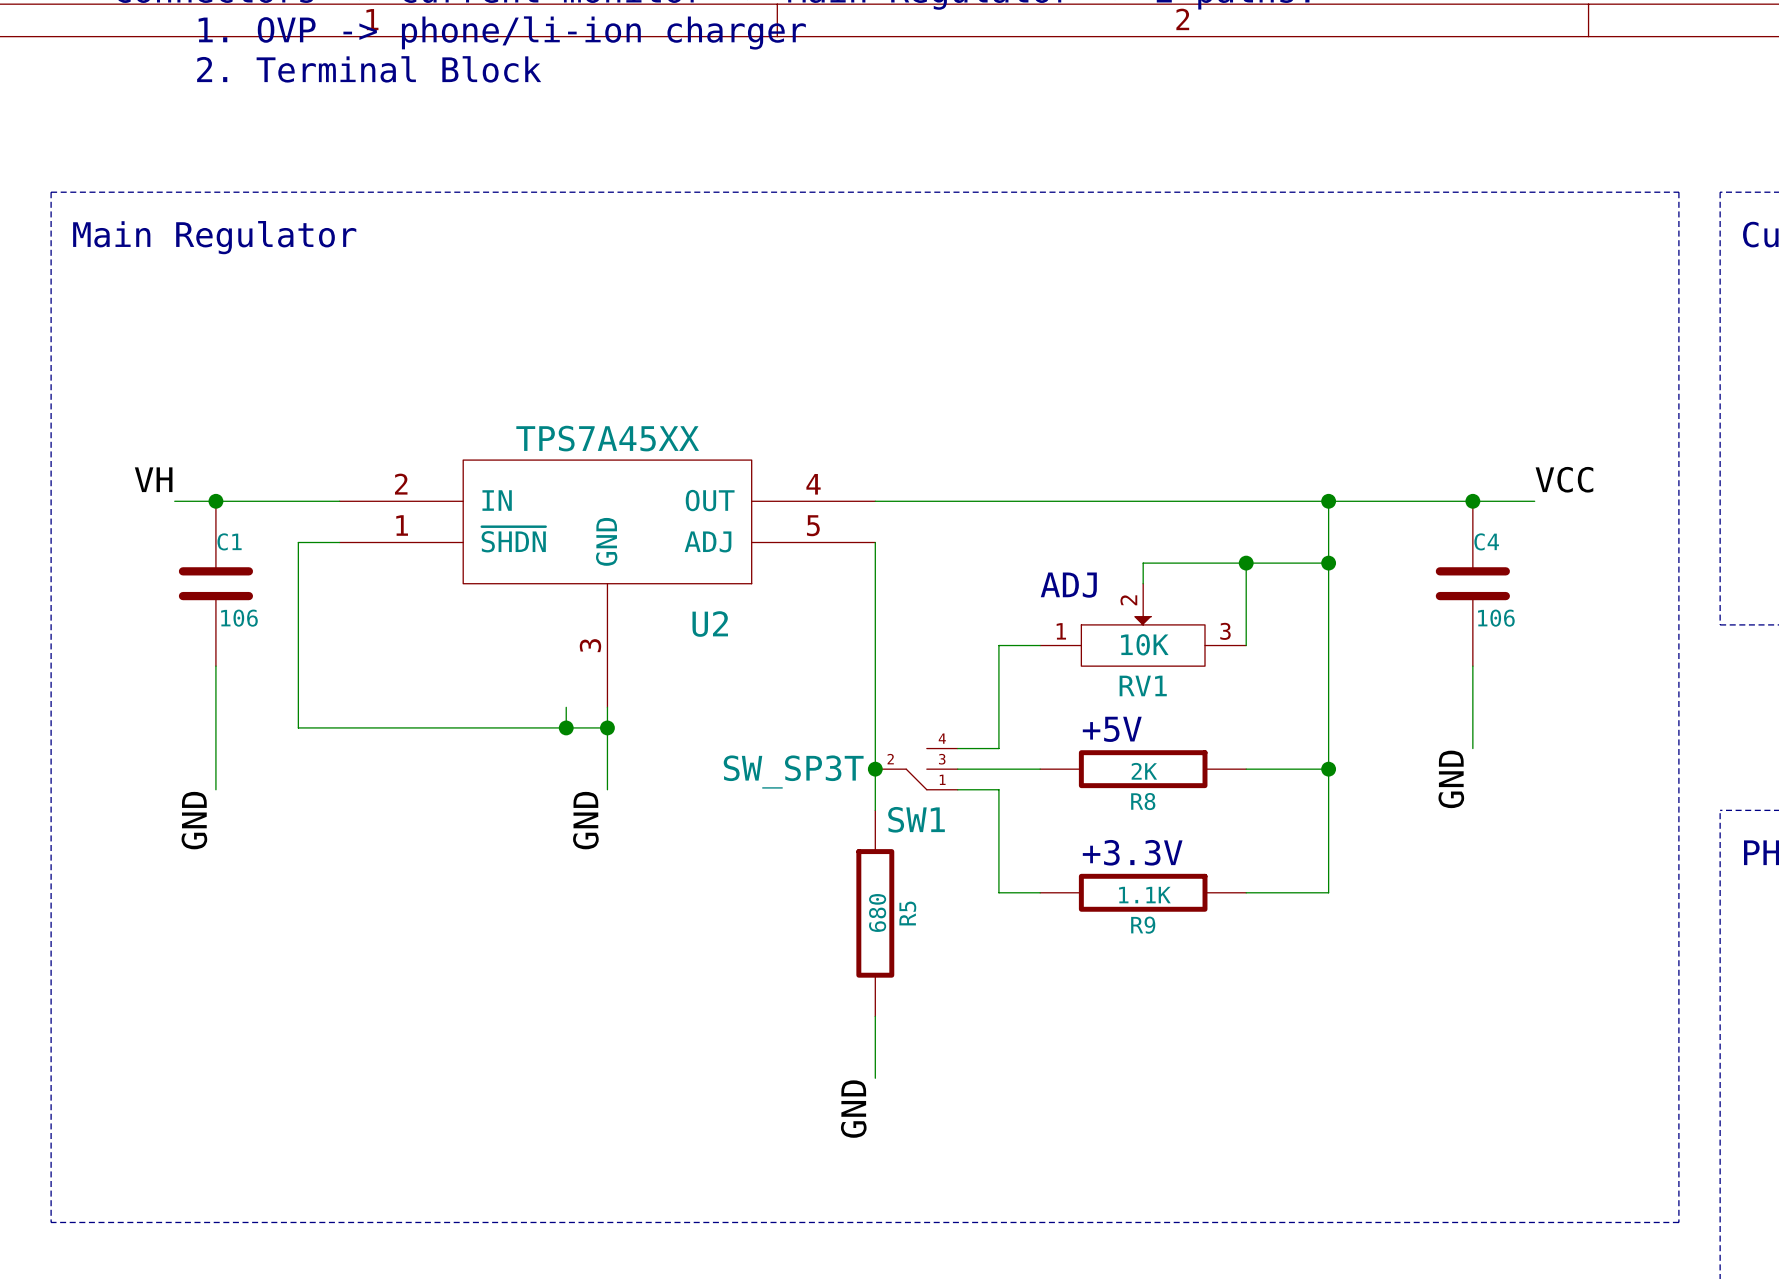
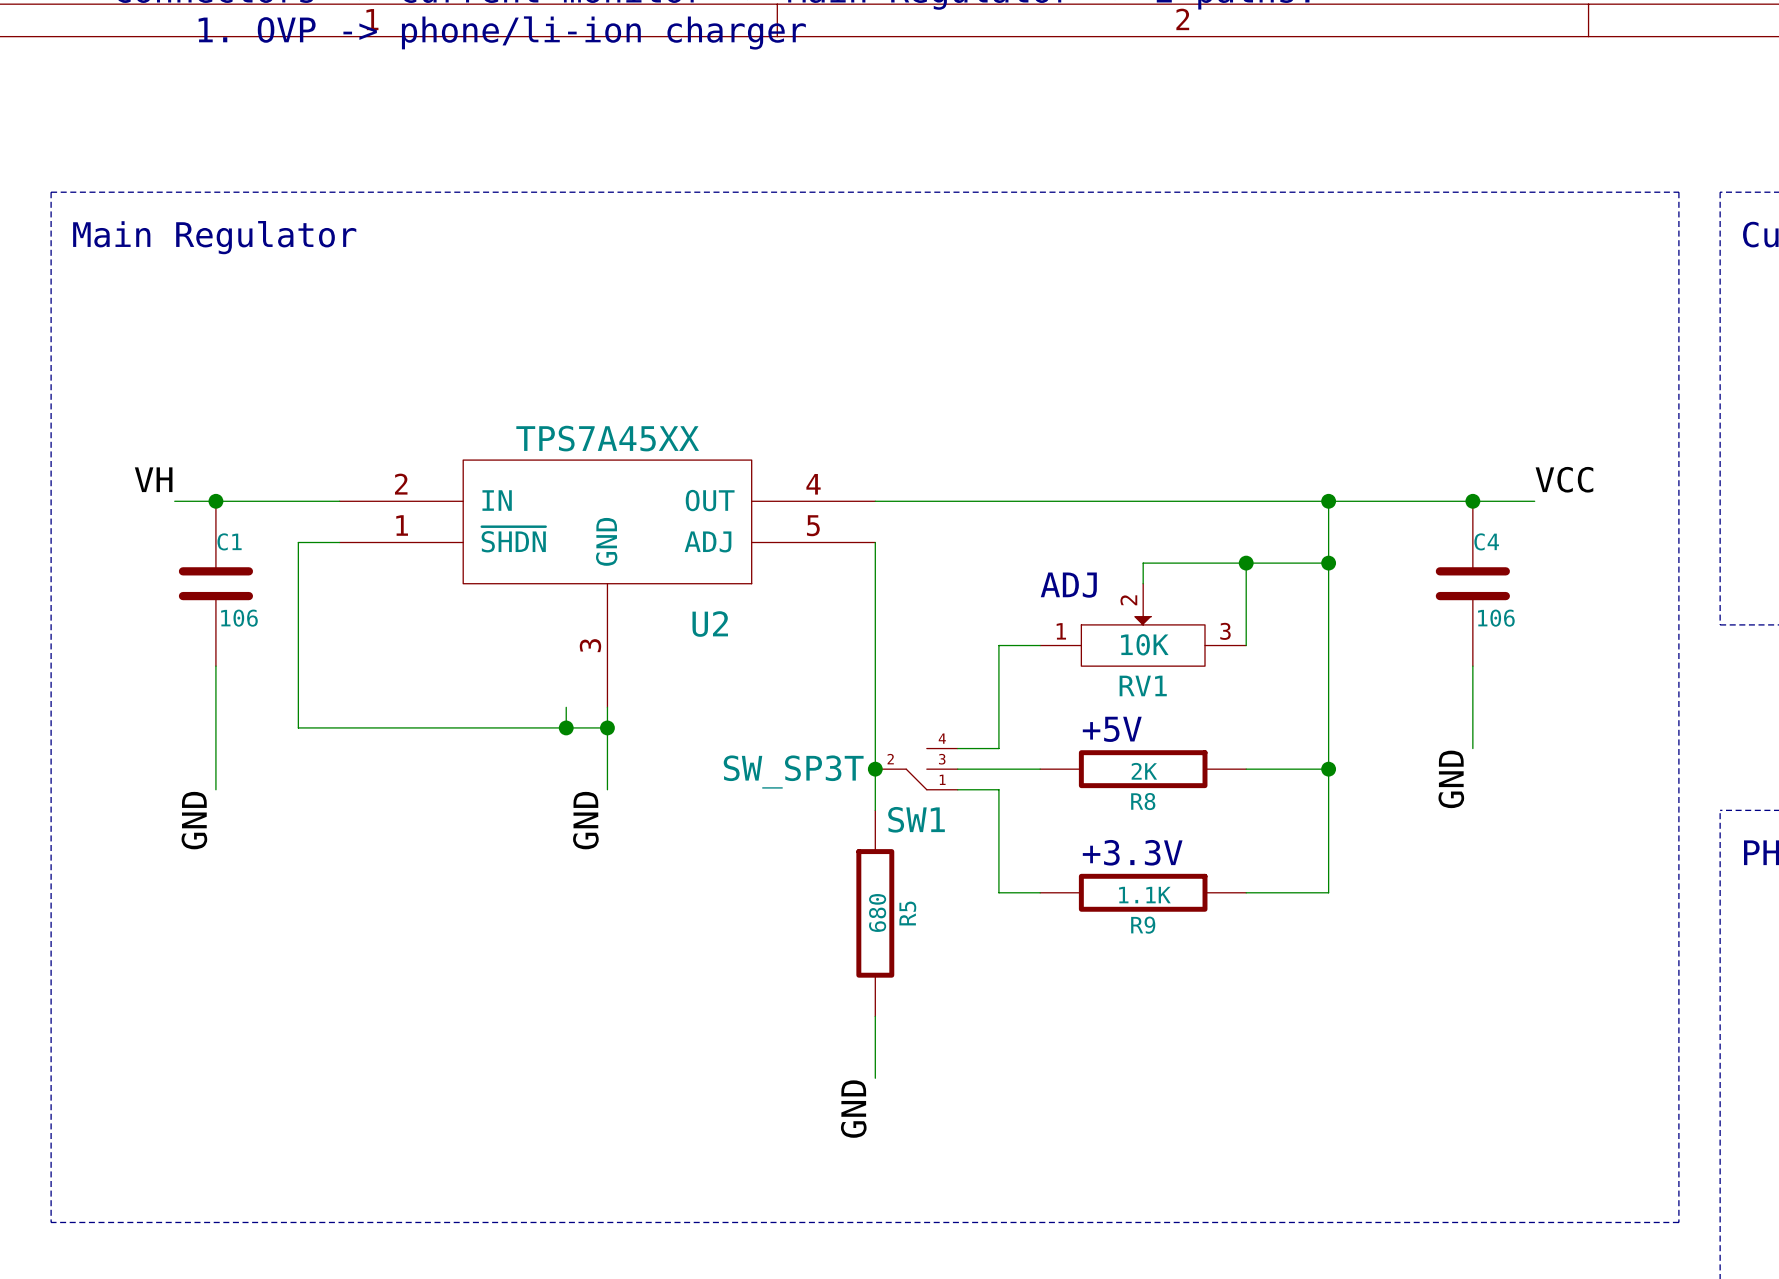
text: 2. Terminal Block (369, 69) -> none

